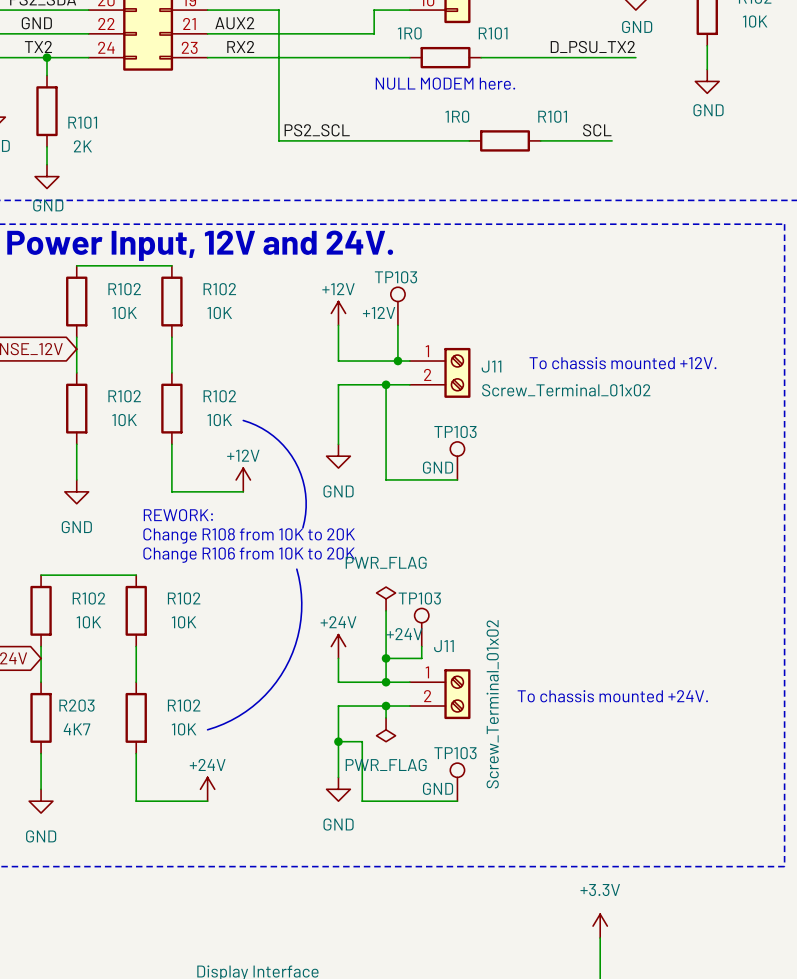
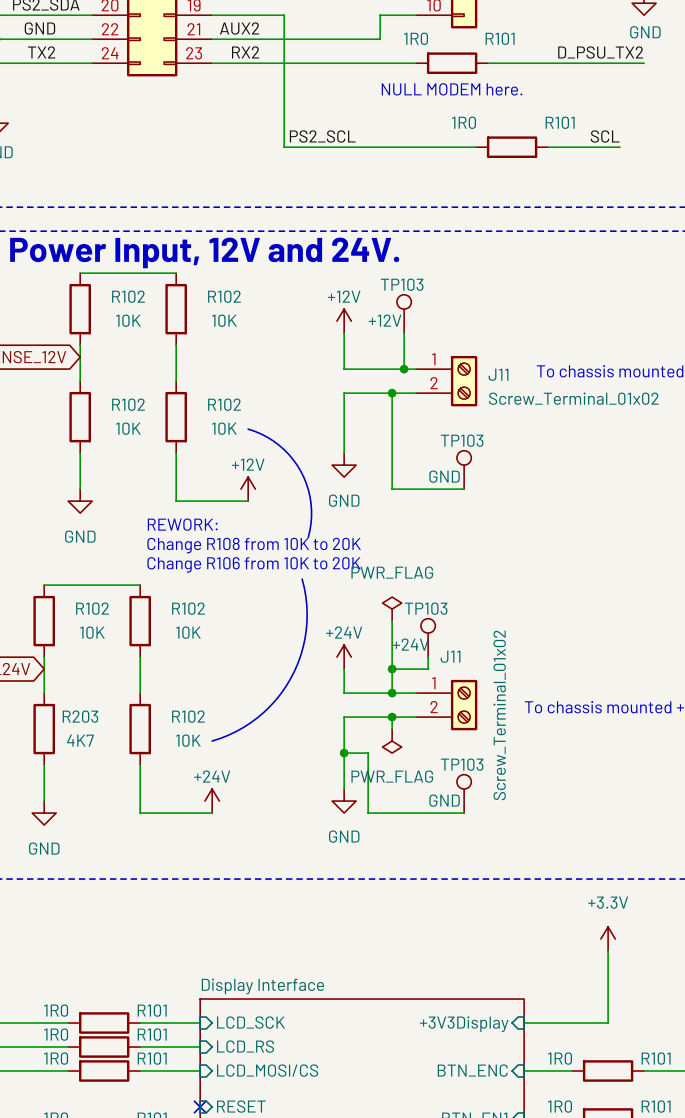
wire: (47, 57) (47, 75) -> none
junction: (47, 57) -> none
R101: 2K (47, 111) -> none
wire: (47, 146) (47, 164) -> none
power symbol: GND (47, 176) -> none

